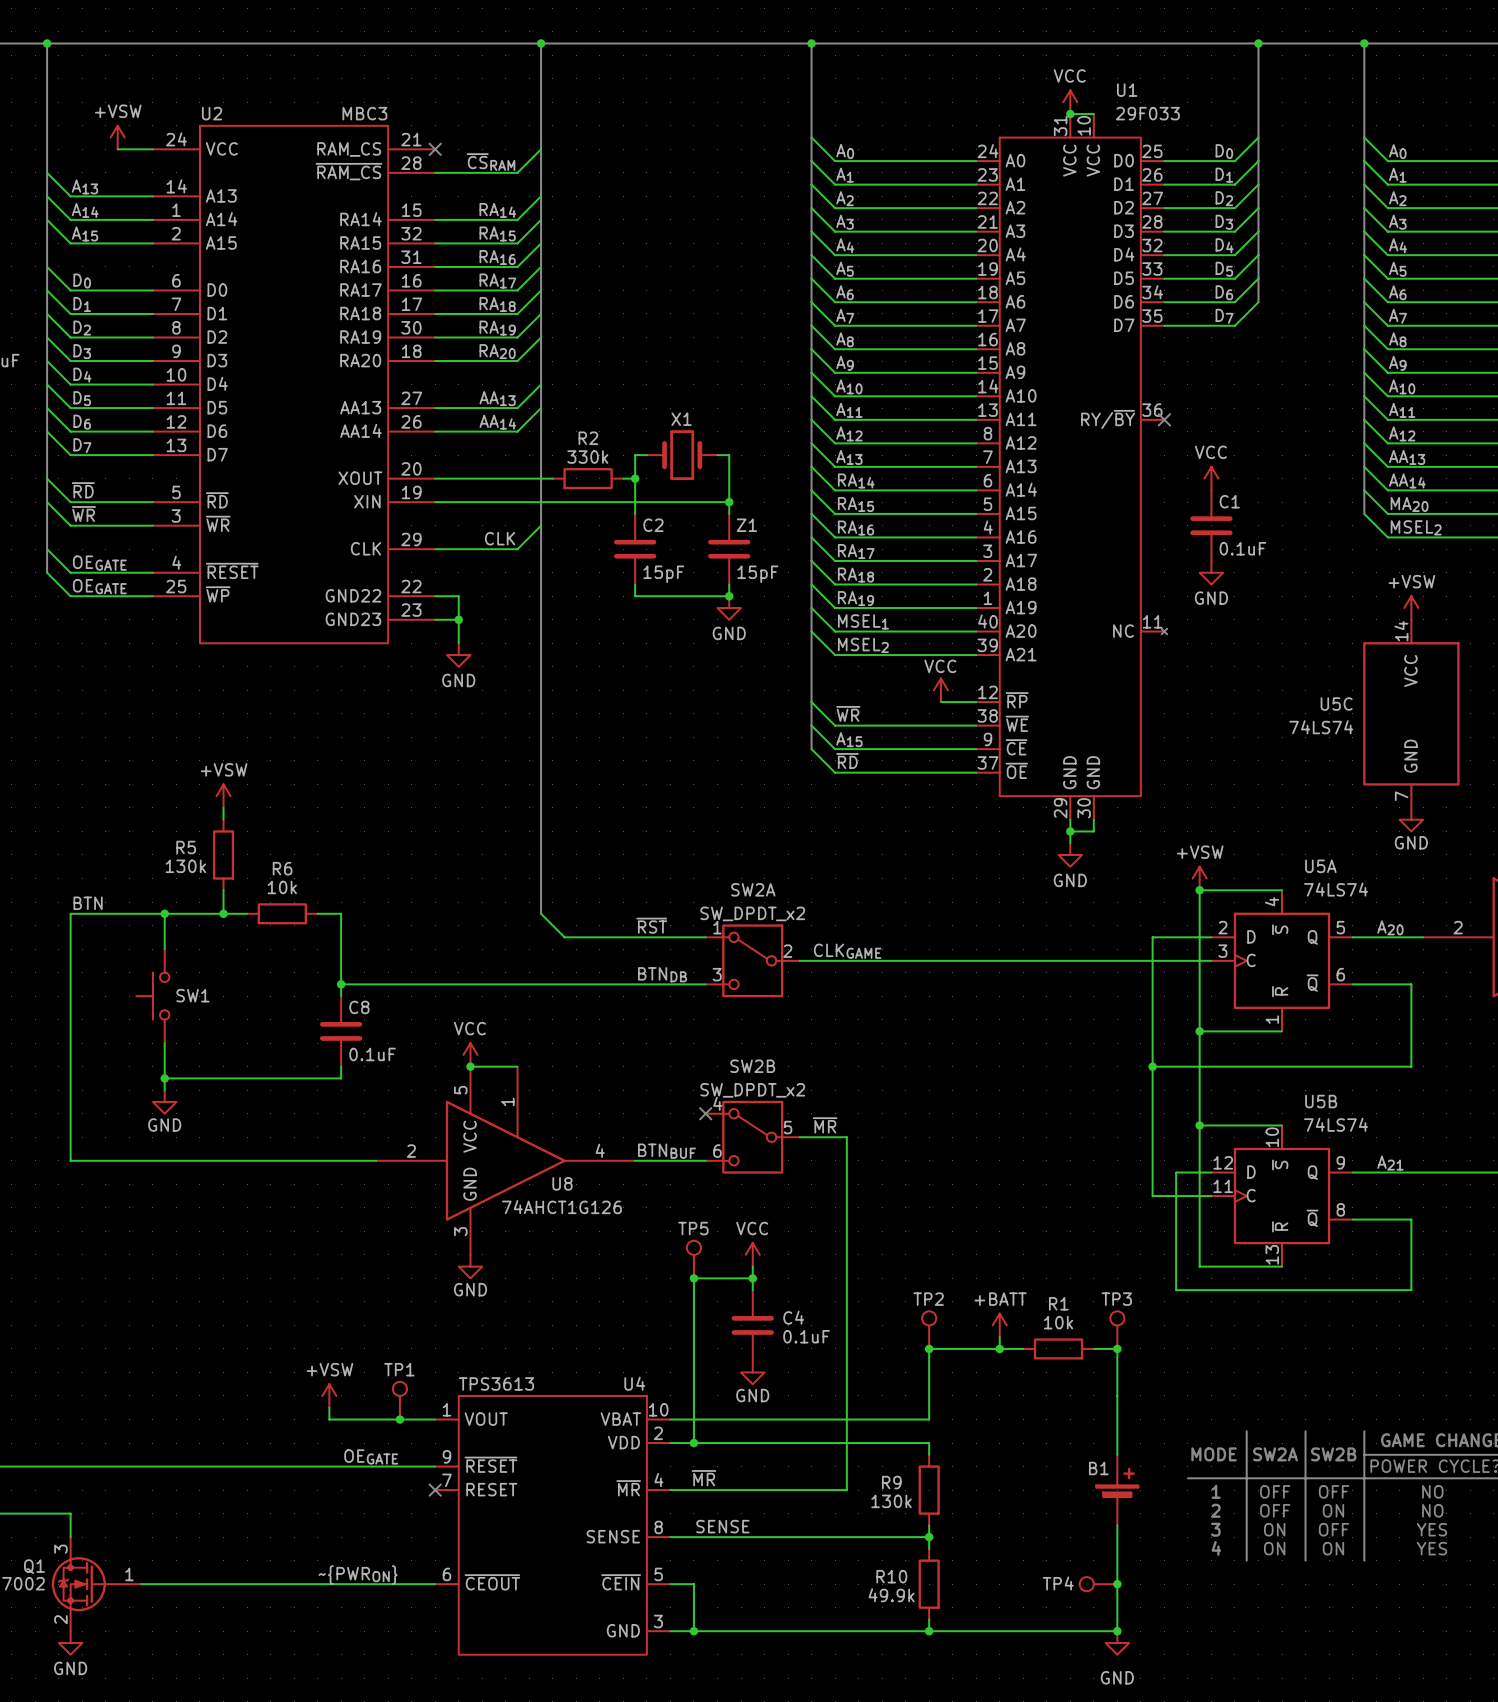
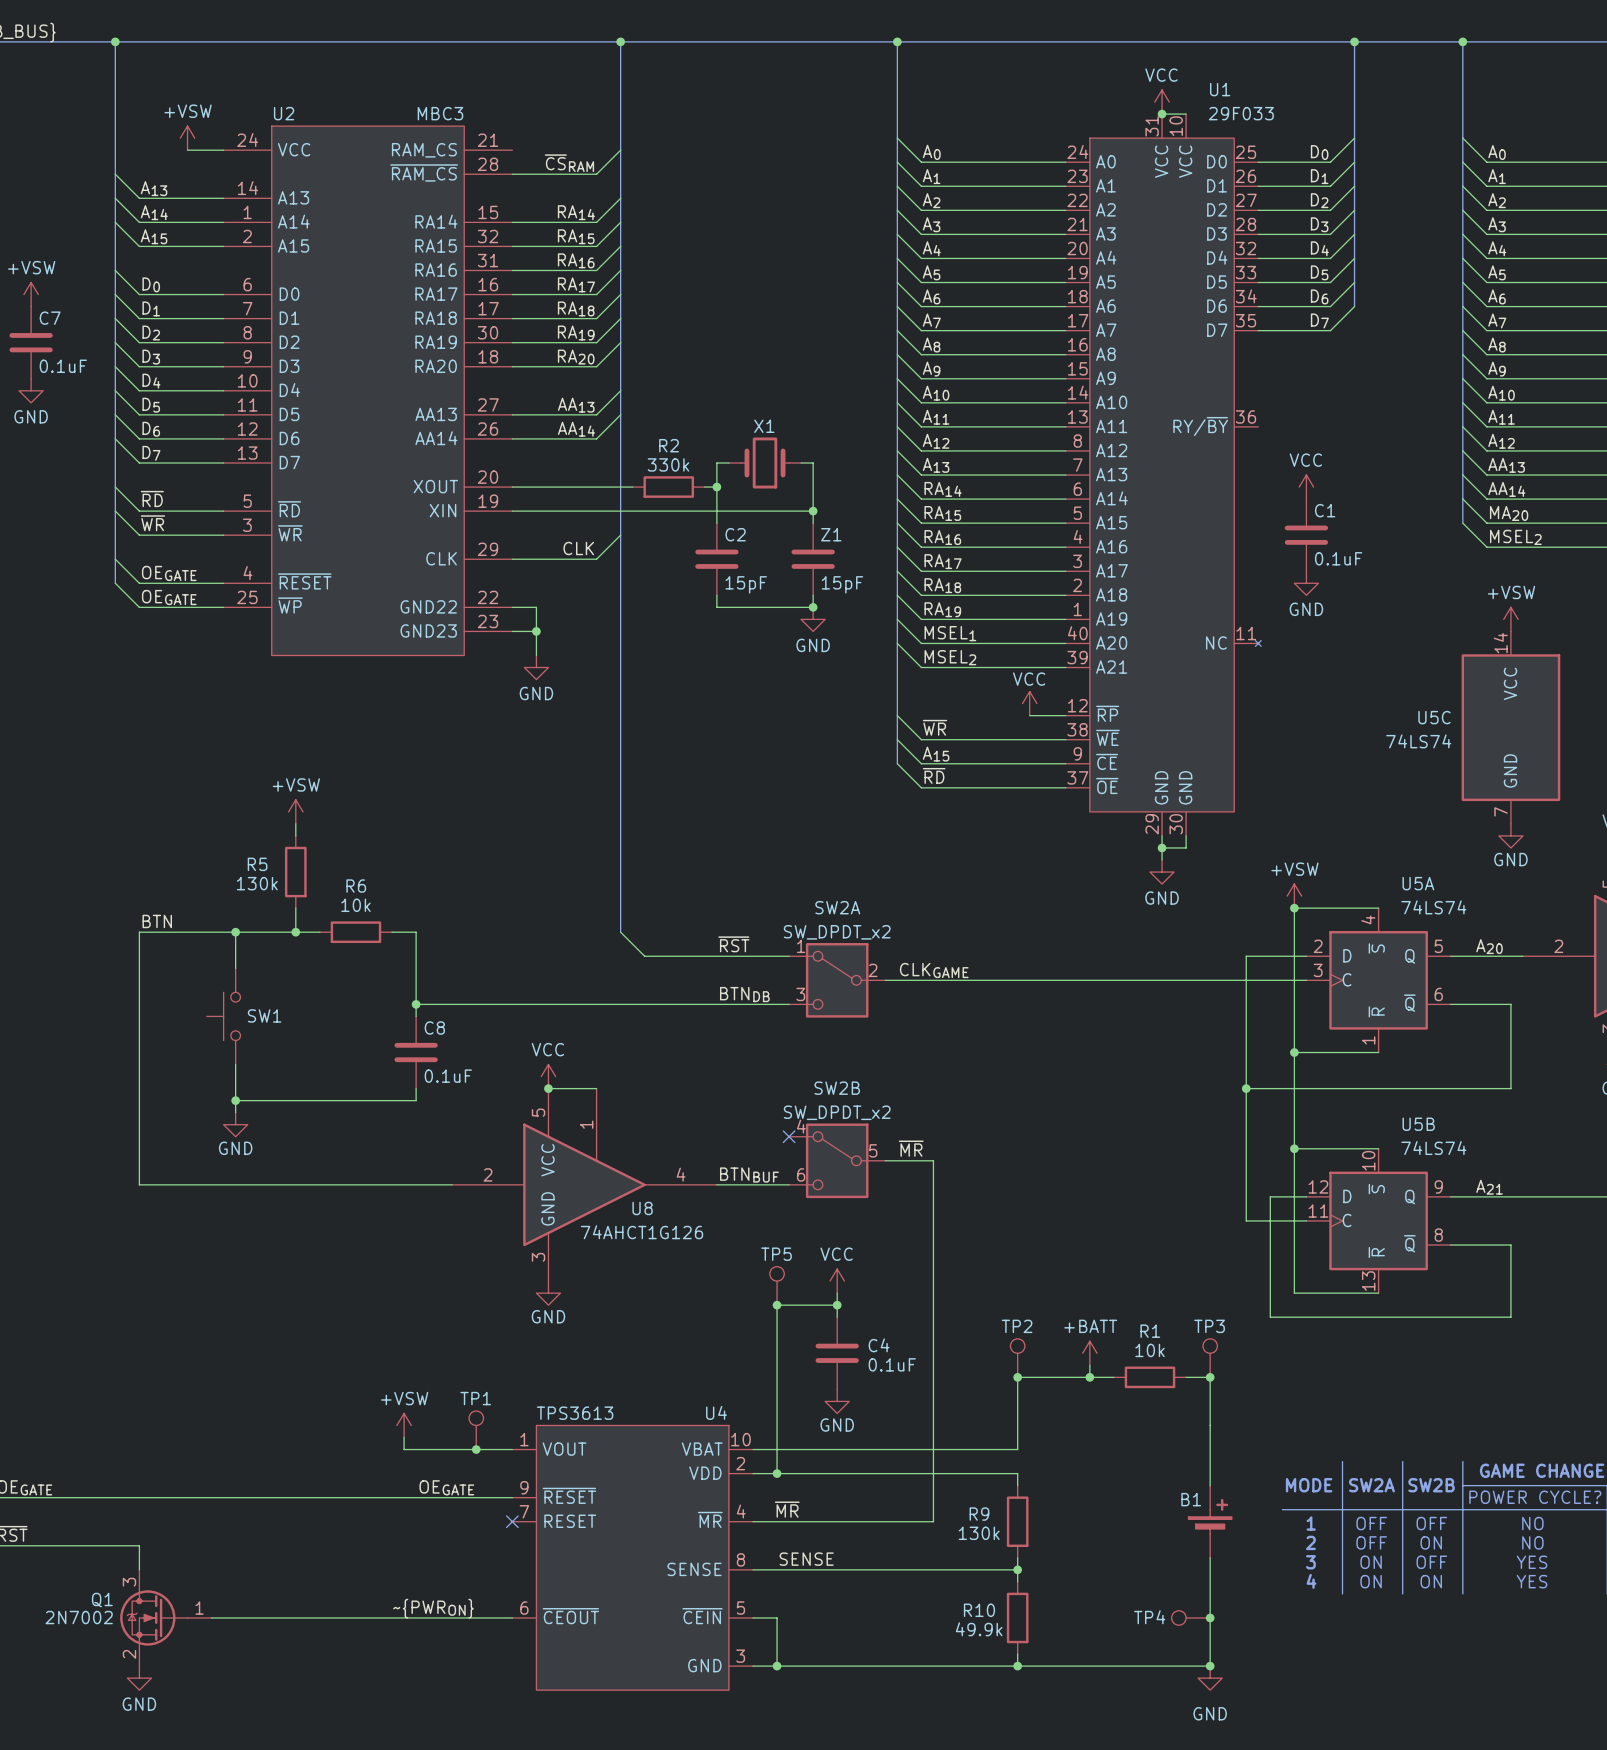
no-connect mark: (435, 149) -> none
no-connect mark: (1164, 419) -> none

